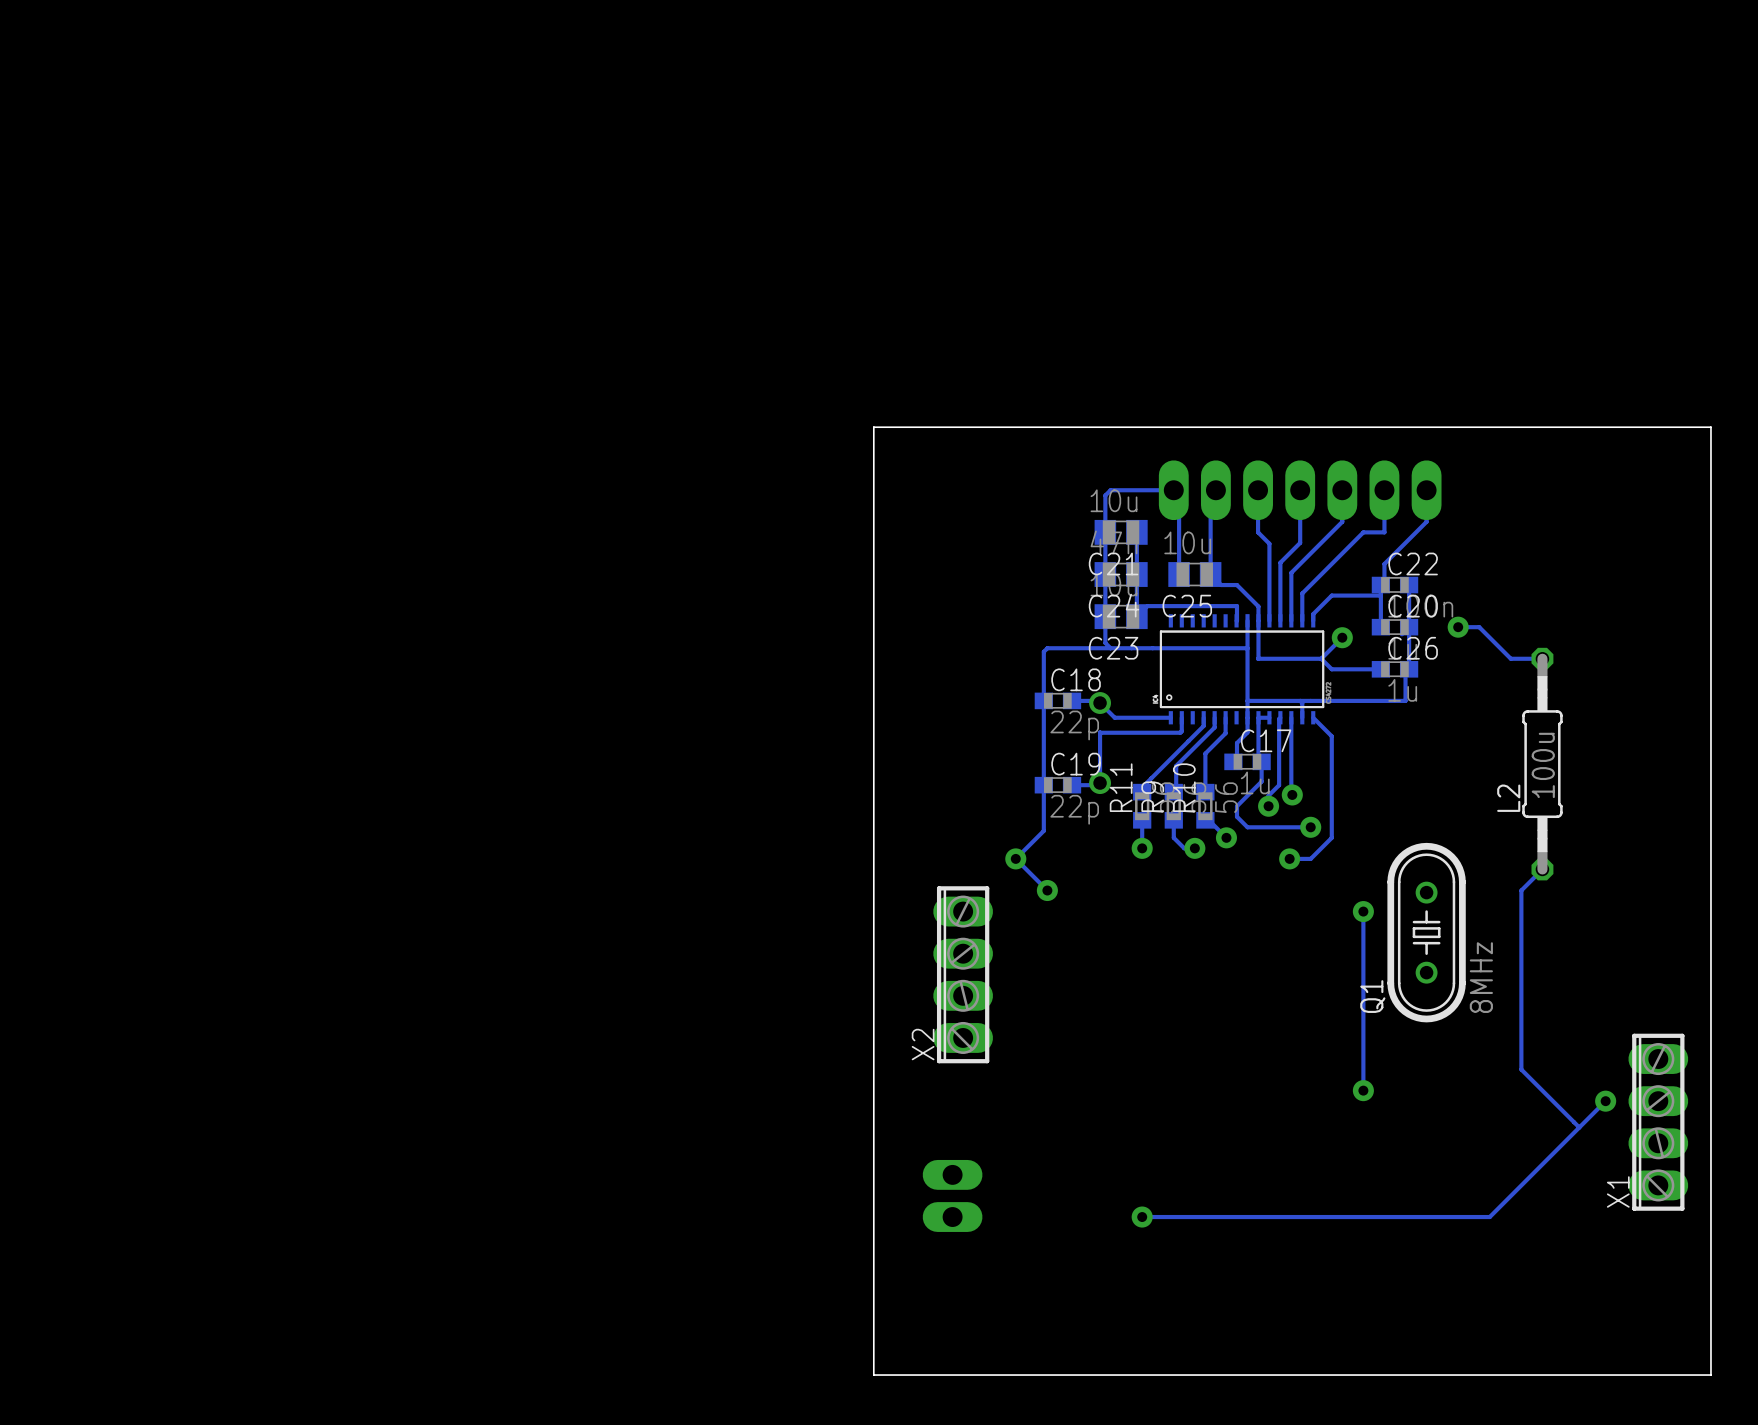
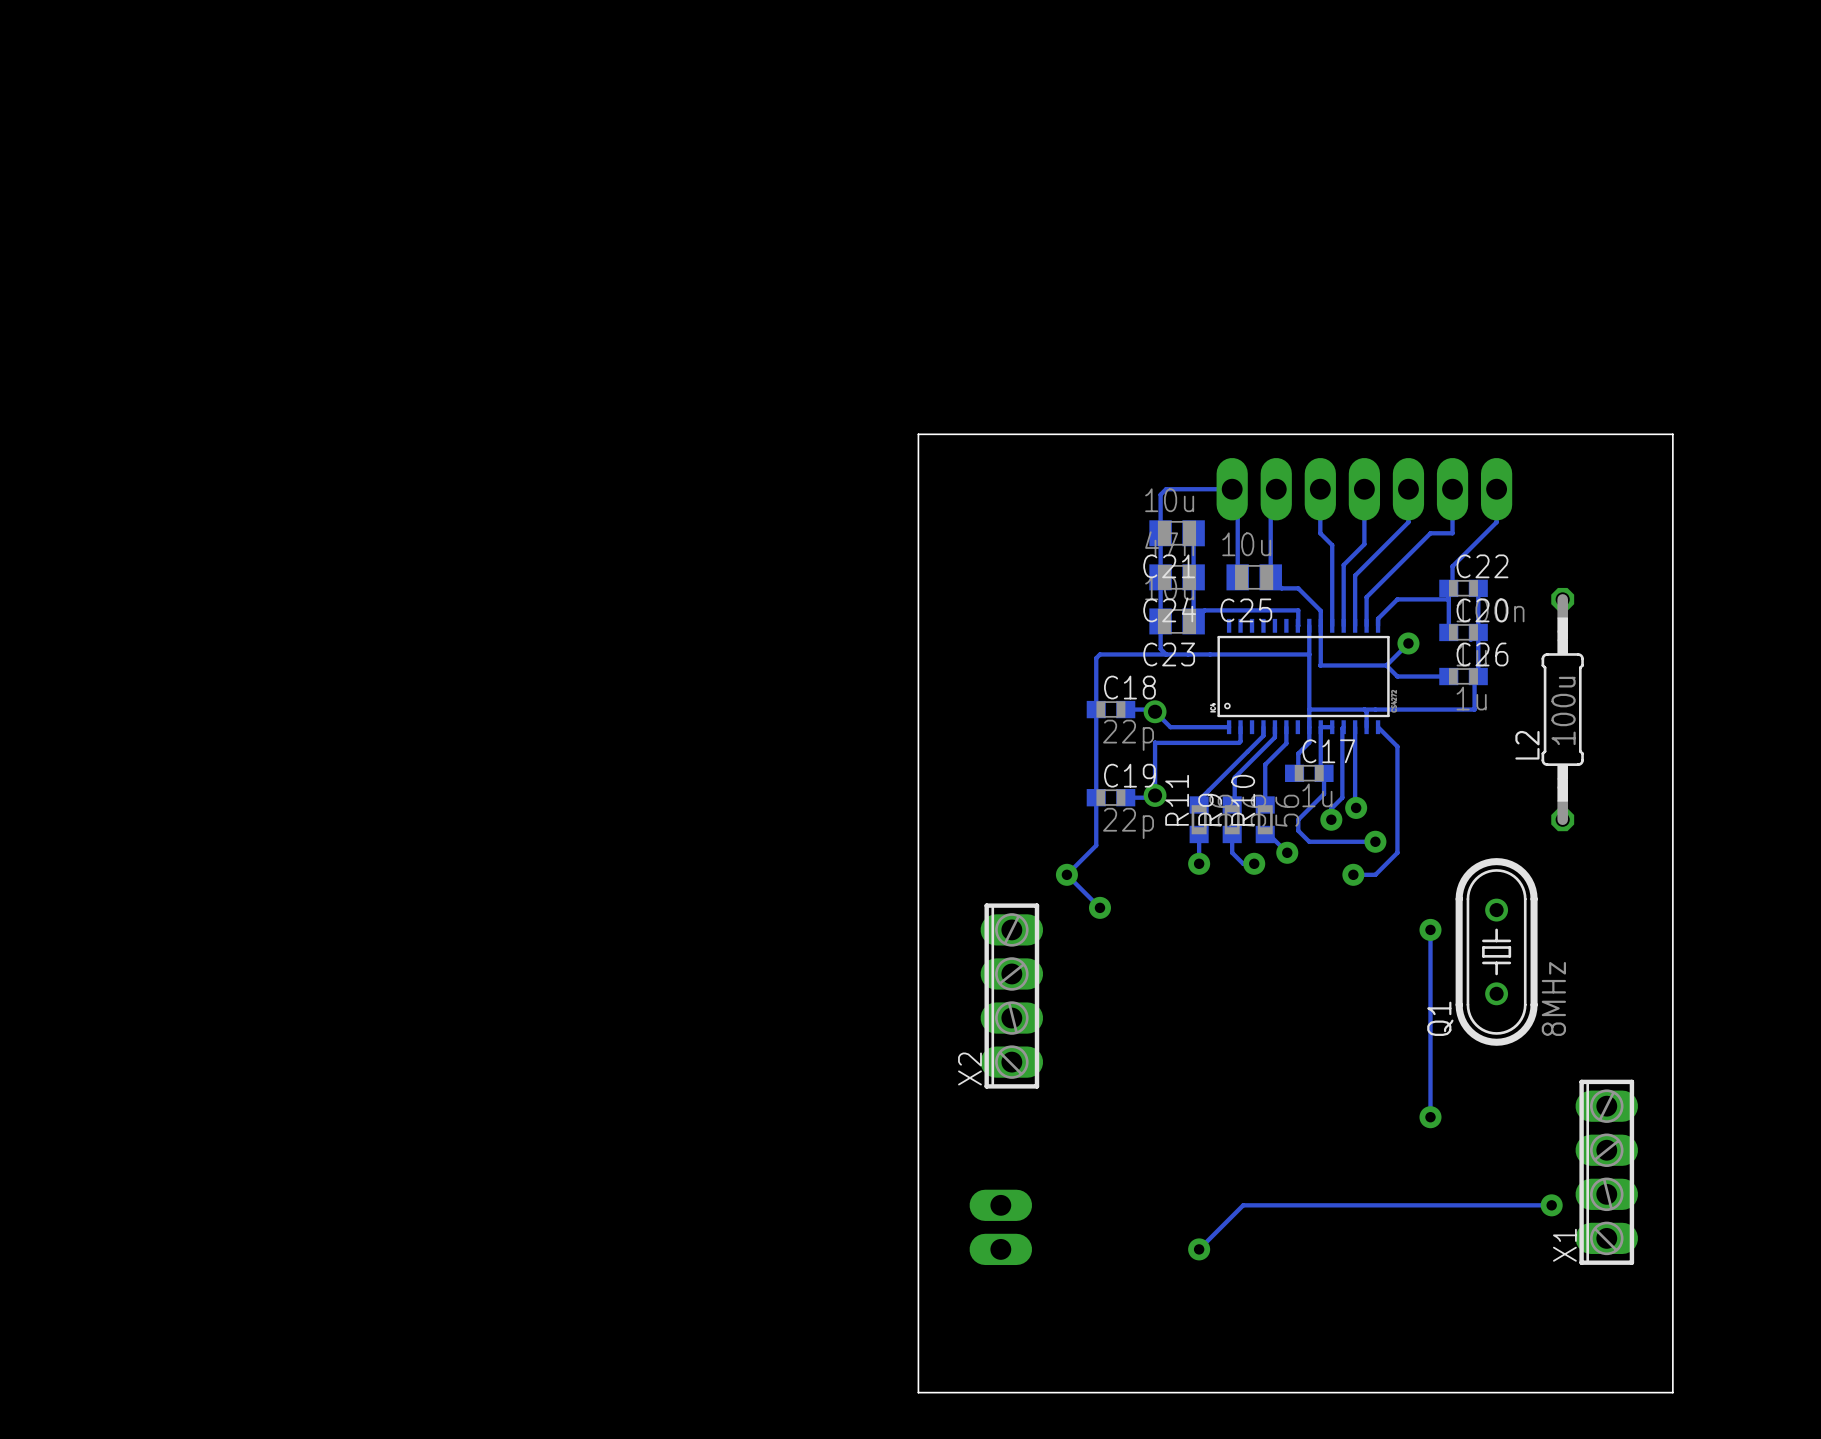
board edge: (873, 437) (873, 427) (1710, 427) (1710, 1375) (873, 1375) (873, 1353) -> (918, 434) (1672, 434) (1672, 1392) (918, 1392)
track: (1458, 627) (1479, 627) (1510, 658) (1542, 658) -> none
via: (1458, 627) -> none
L2 position: (1542, 764) -> (1562, 709)
track: (1542, 869) (1521, 890) (1521, 1069) (1579, 1127) -> none
track: (1605, 1101) (1489, 1217) (1142, 1217) -> (1551, 1205) (1243, 1205) (1199, 1249)
via: (1605, 1101) -> none
X1 position: (1658, 1122) -> (1606, 1172)
via: none -> (1551, 1205)

